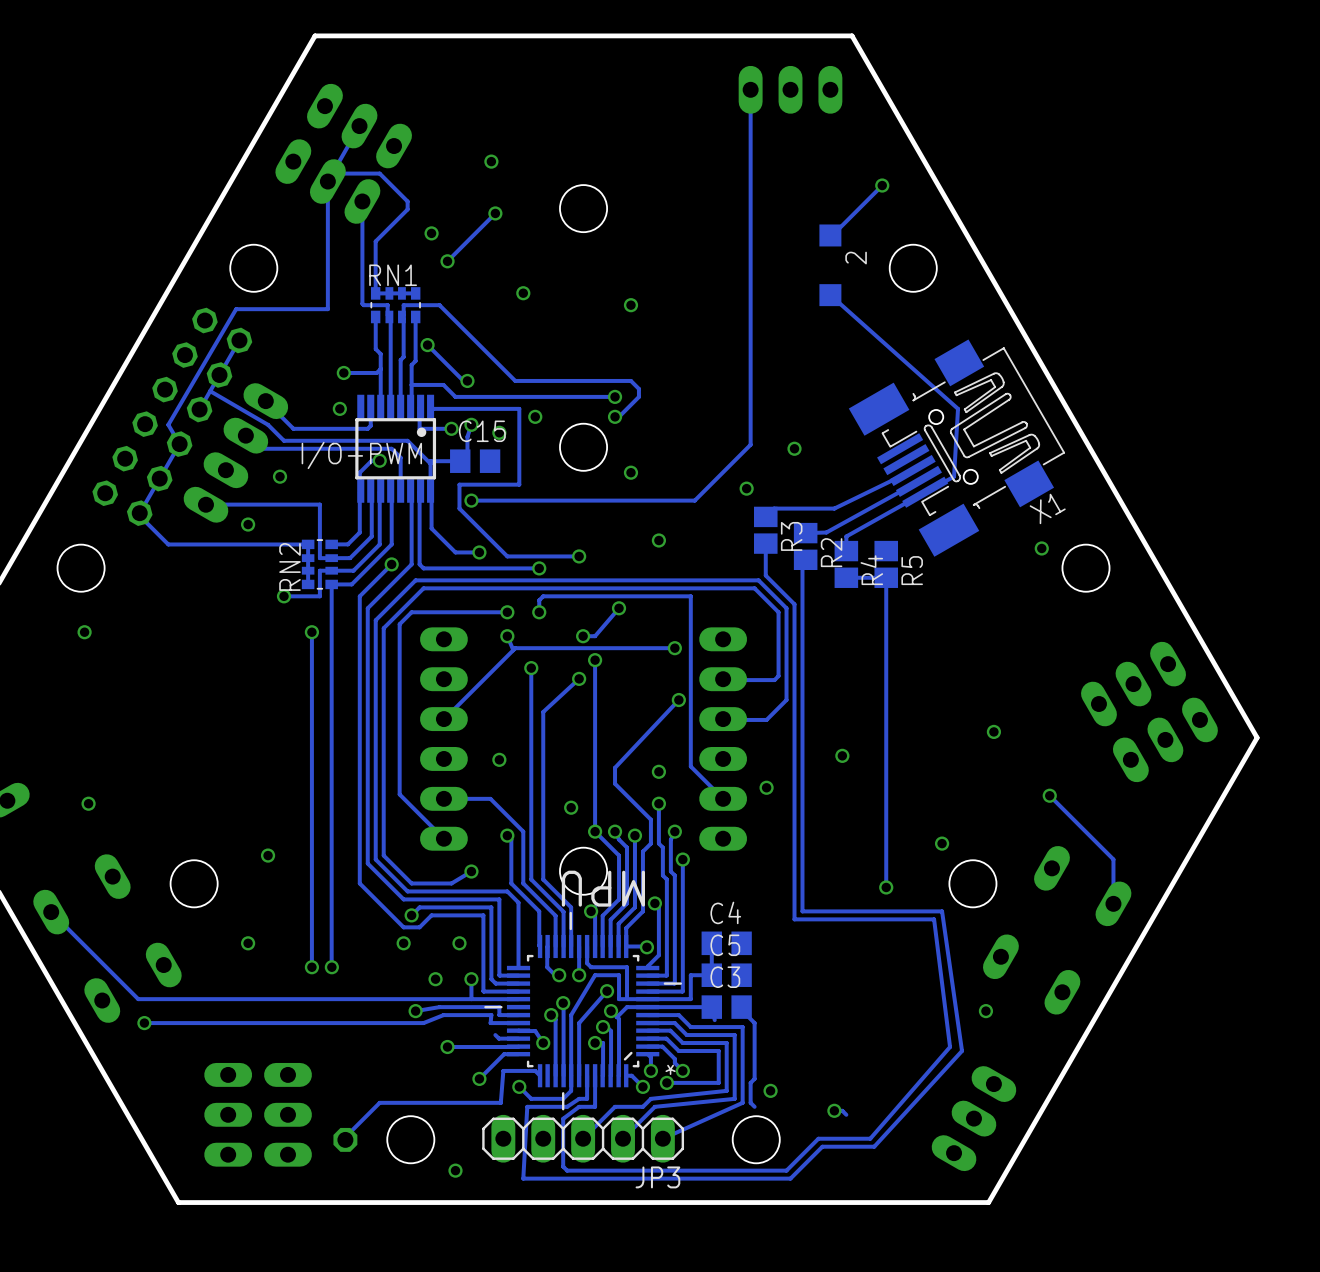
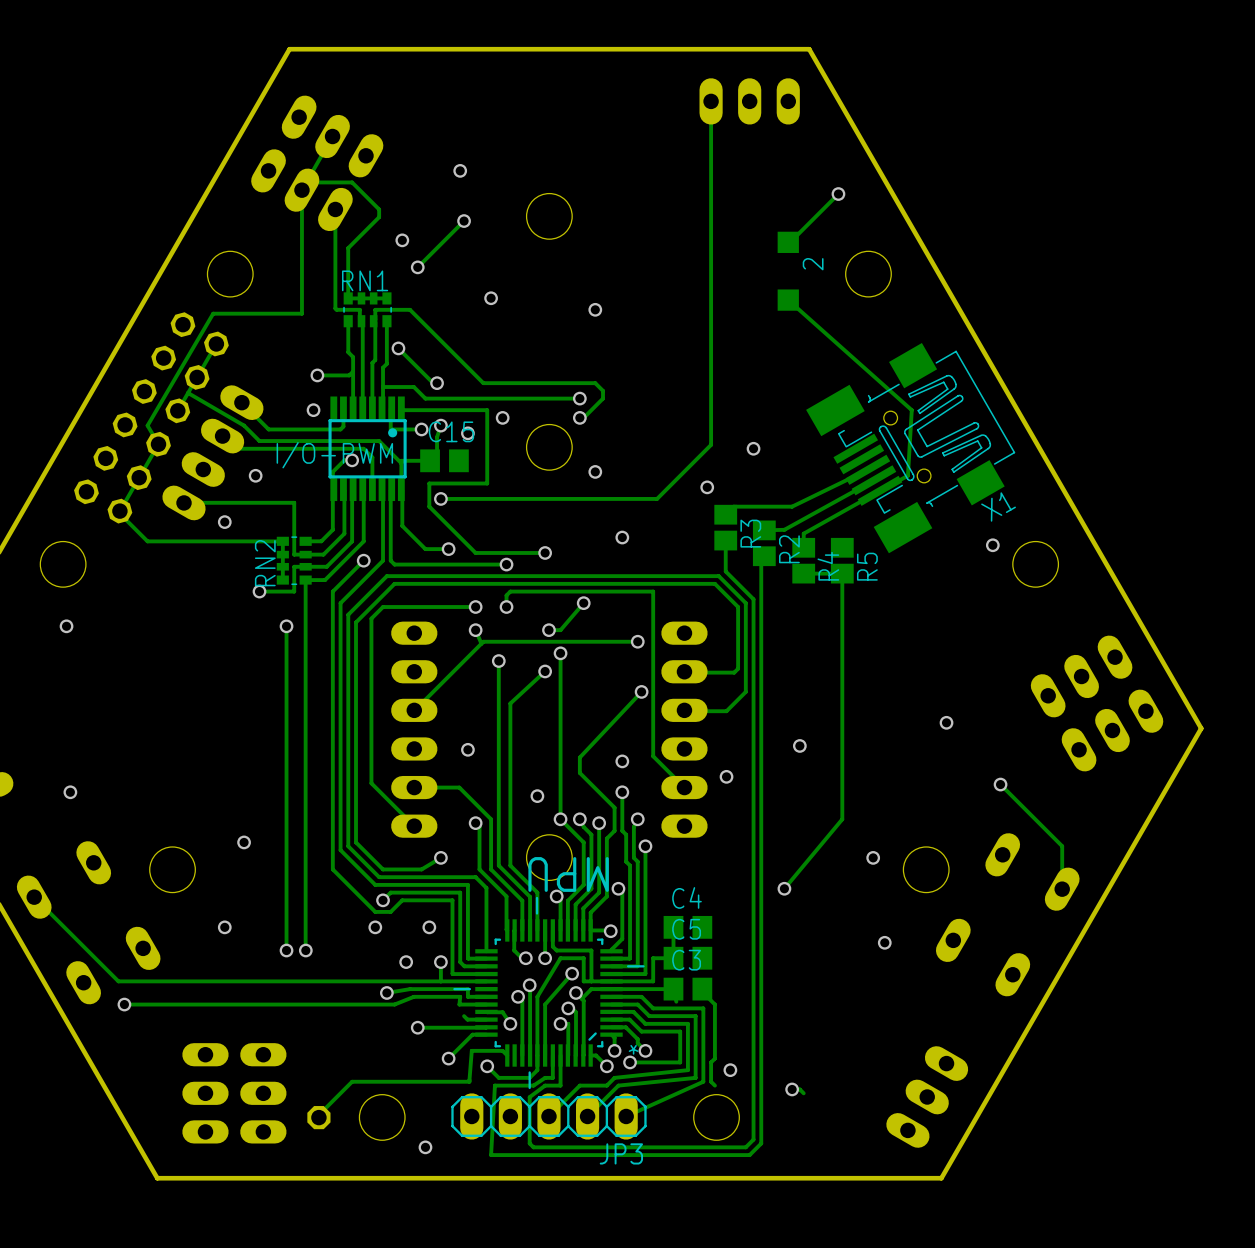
track: (886, 831) (886, 887) -> (842, 819) (784, 888)
via: (942, 843) -> none
via: none -> (873, 857)
via: (886, 887) -> none
via: none -> (784, 888)
track: (802, 911) (942, 911) (962, 1050) (874, 1146) (822, 1146) (802, 1166) -> (761, 896) (761, 1143)
track: (794, 919) (934, 919) (950, 1047) (870, 1138) (818, 1138) (794, 1162) -> (753, 904) (753, 1139)
via: none -> (884, 942)
via: (985, 1011) -> none

